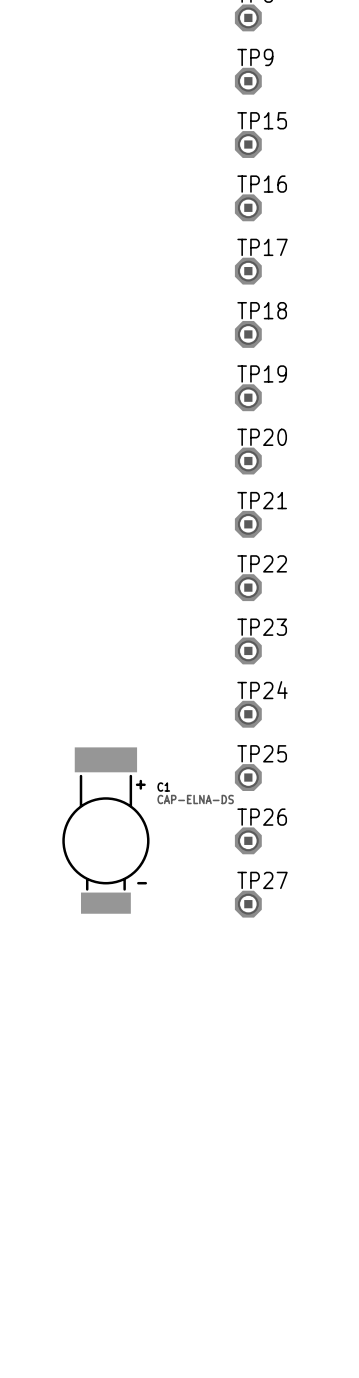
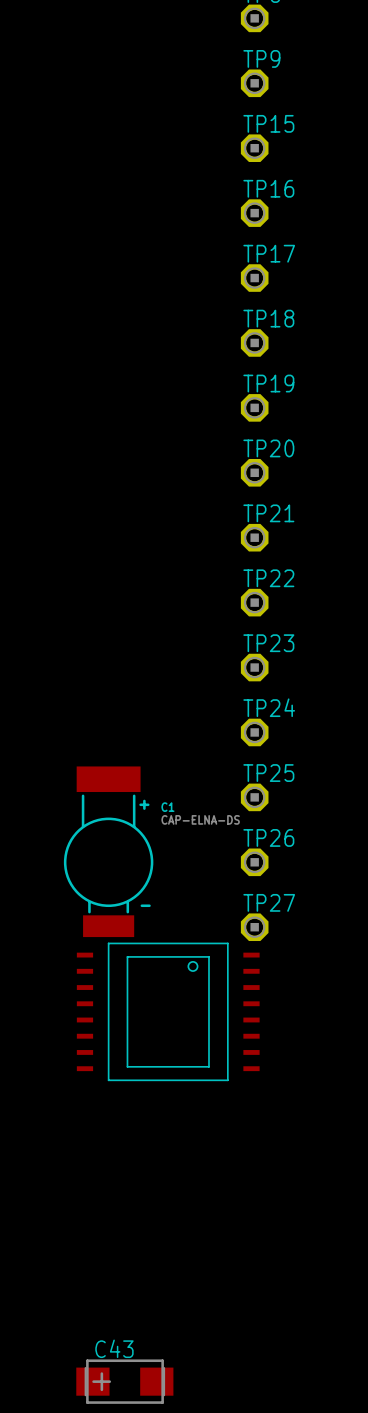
part: none -> (168, 1011)
C43: none -> (124, 1381)

